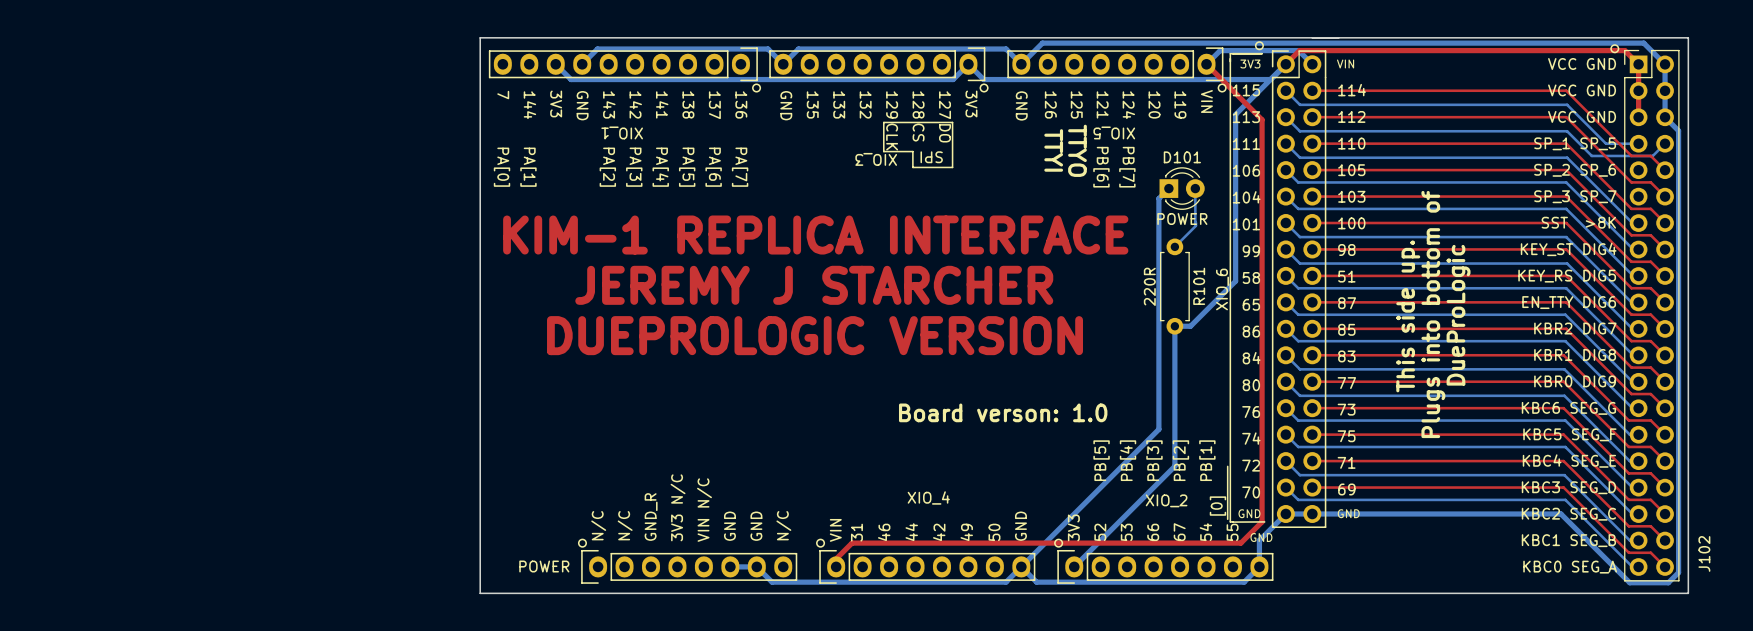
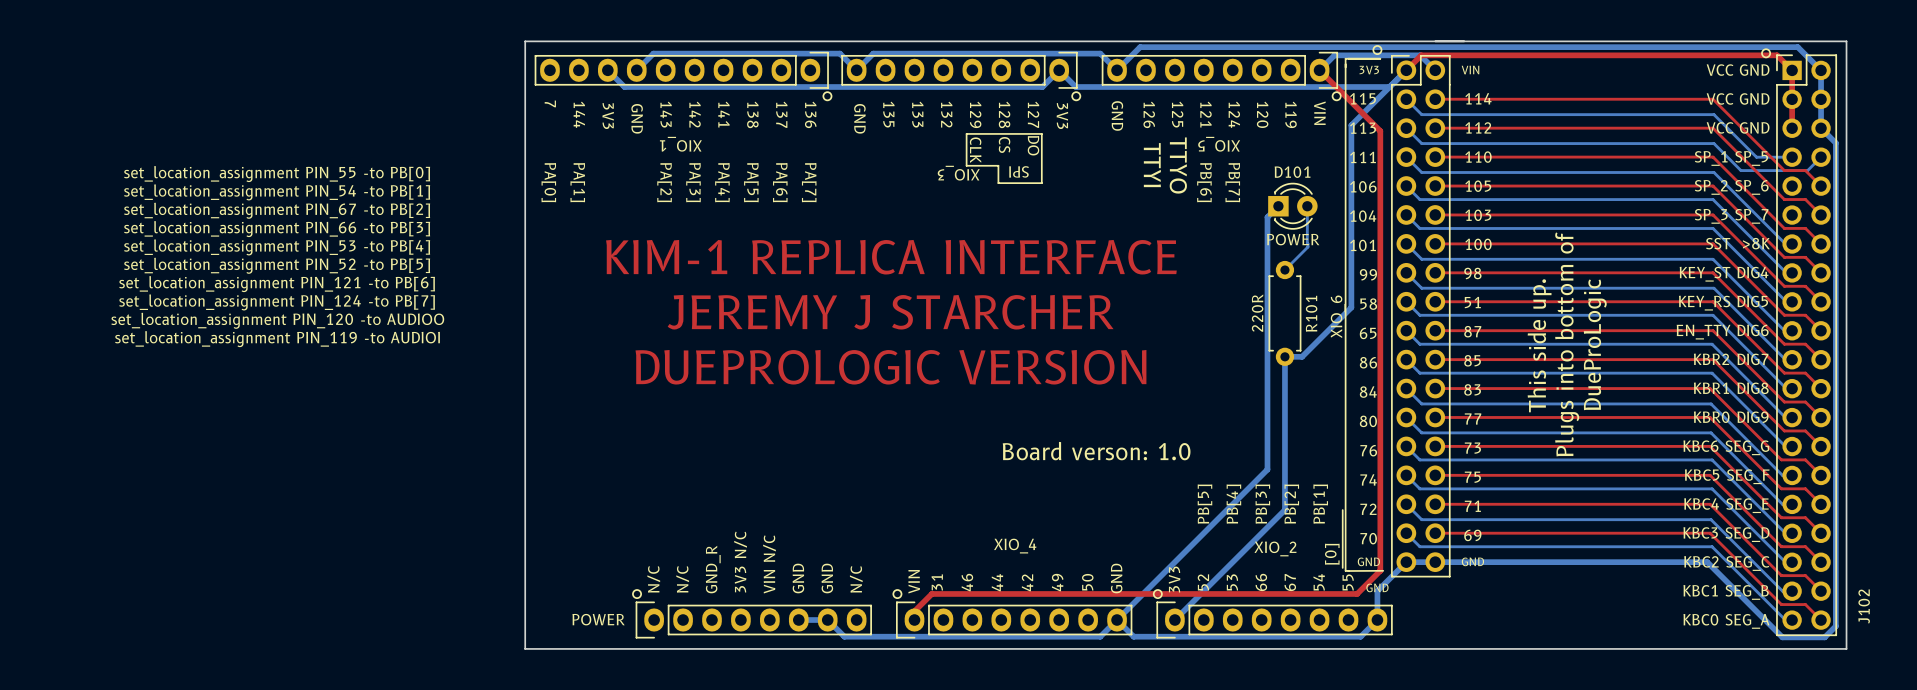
text: none -> set_location_assignment PIN_55 -to PB[0] (277, 174)
text: none -> set_location_assignment PIN_54 -to PB[1] (277, 192)
text: none -> set_location_assignment PIN_67 -to PB[2] (277, 210)
text: none -> set_location_assignment PIN_66 -to PB[3] (277, 229)
text: none -> set_location_assignment PIN_53 -to PB[4] (277, 247)
text: none -> set_location_assignment PIN_52 -to PB[5] (277, 265)
text: none -> set_location_assignment PIN_121 -to PB[6] (277, 284)
text: none -> set_location_assignment PIN_124 -to PB[7] (277, 302)
text: none -> set_location_assignment PIN_120 -to AUDIOO (277, 320)
text: none -> set_location_assignment PIN_119 -to AUDIOI (277, 339)

